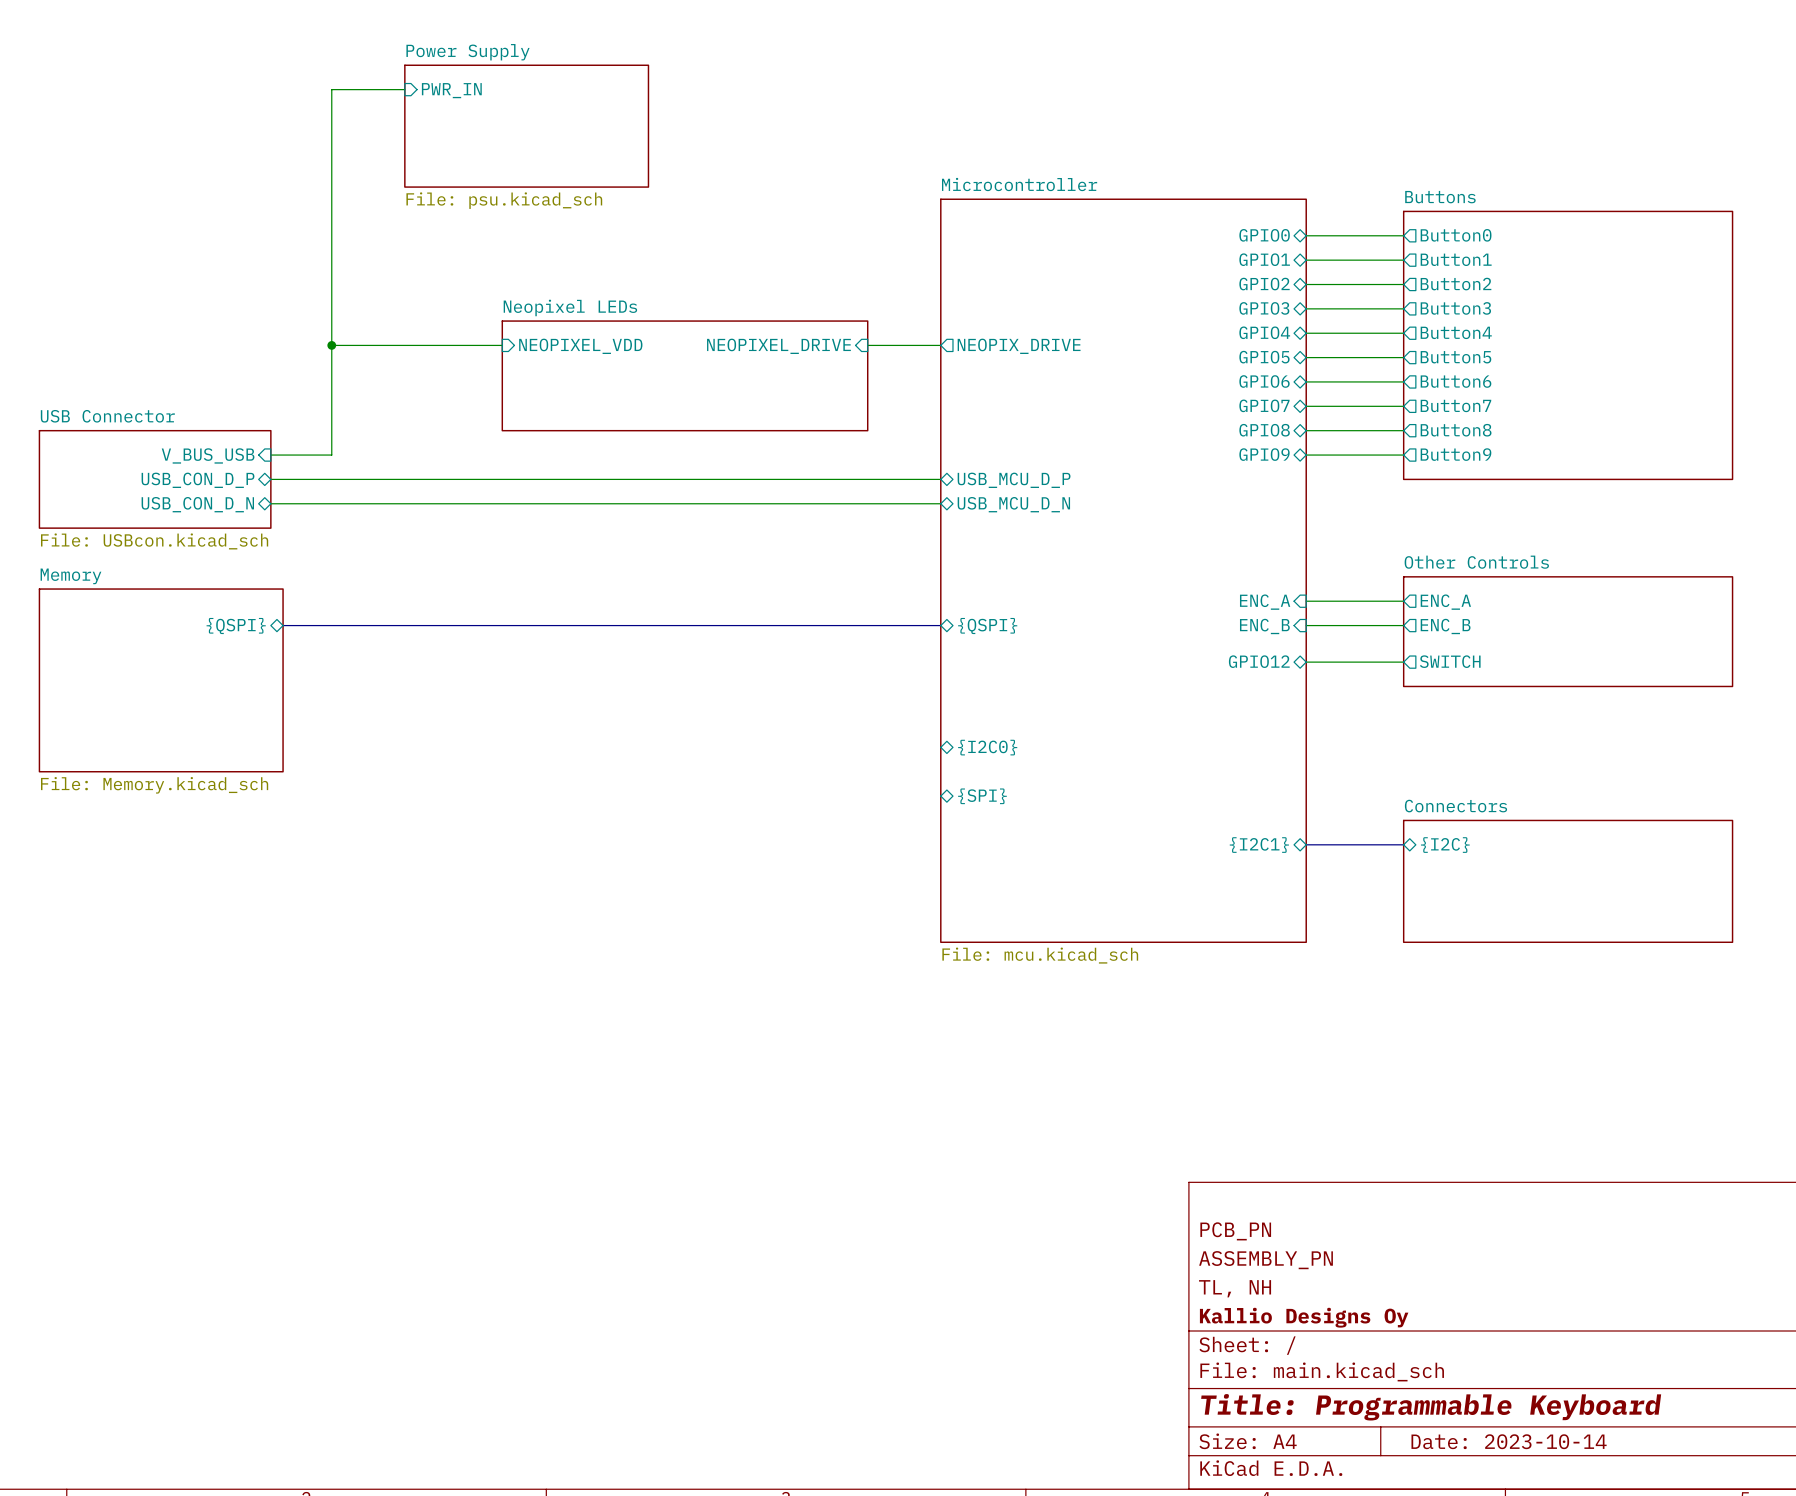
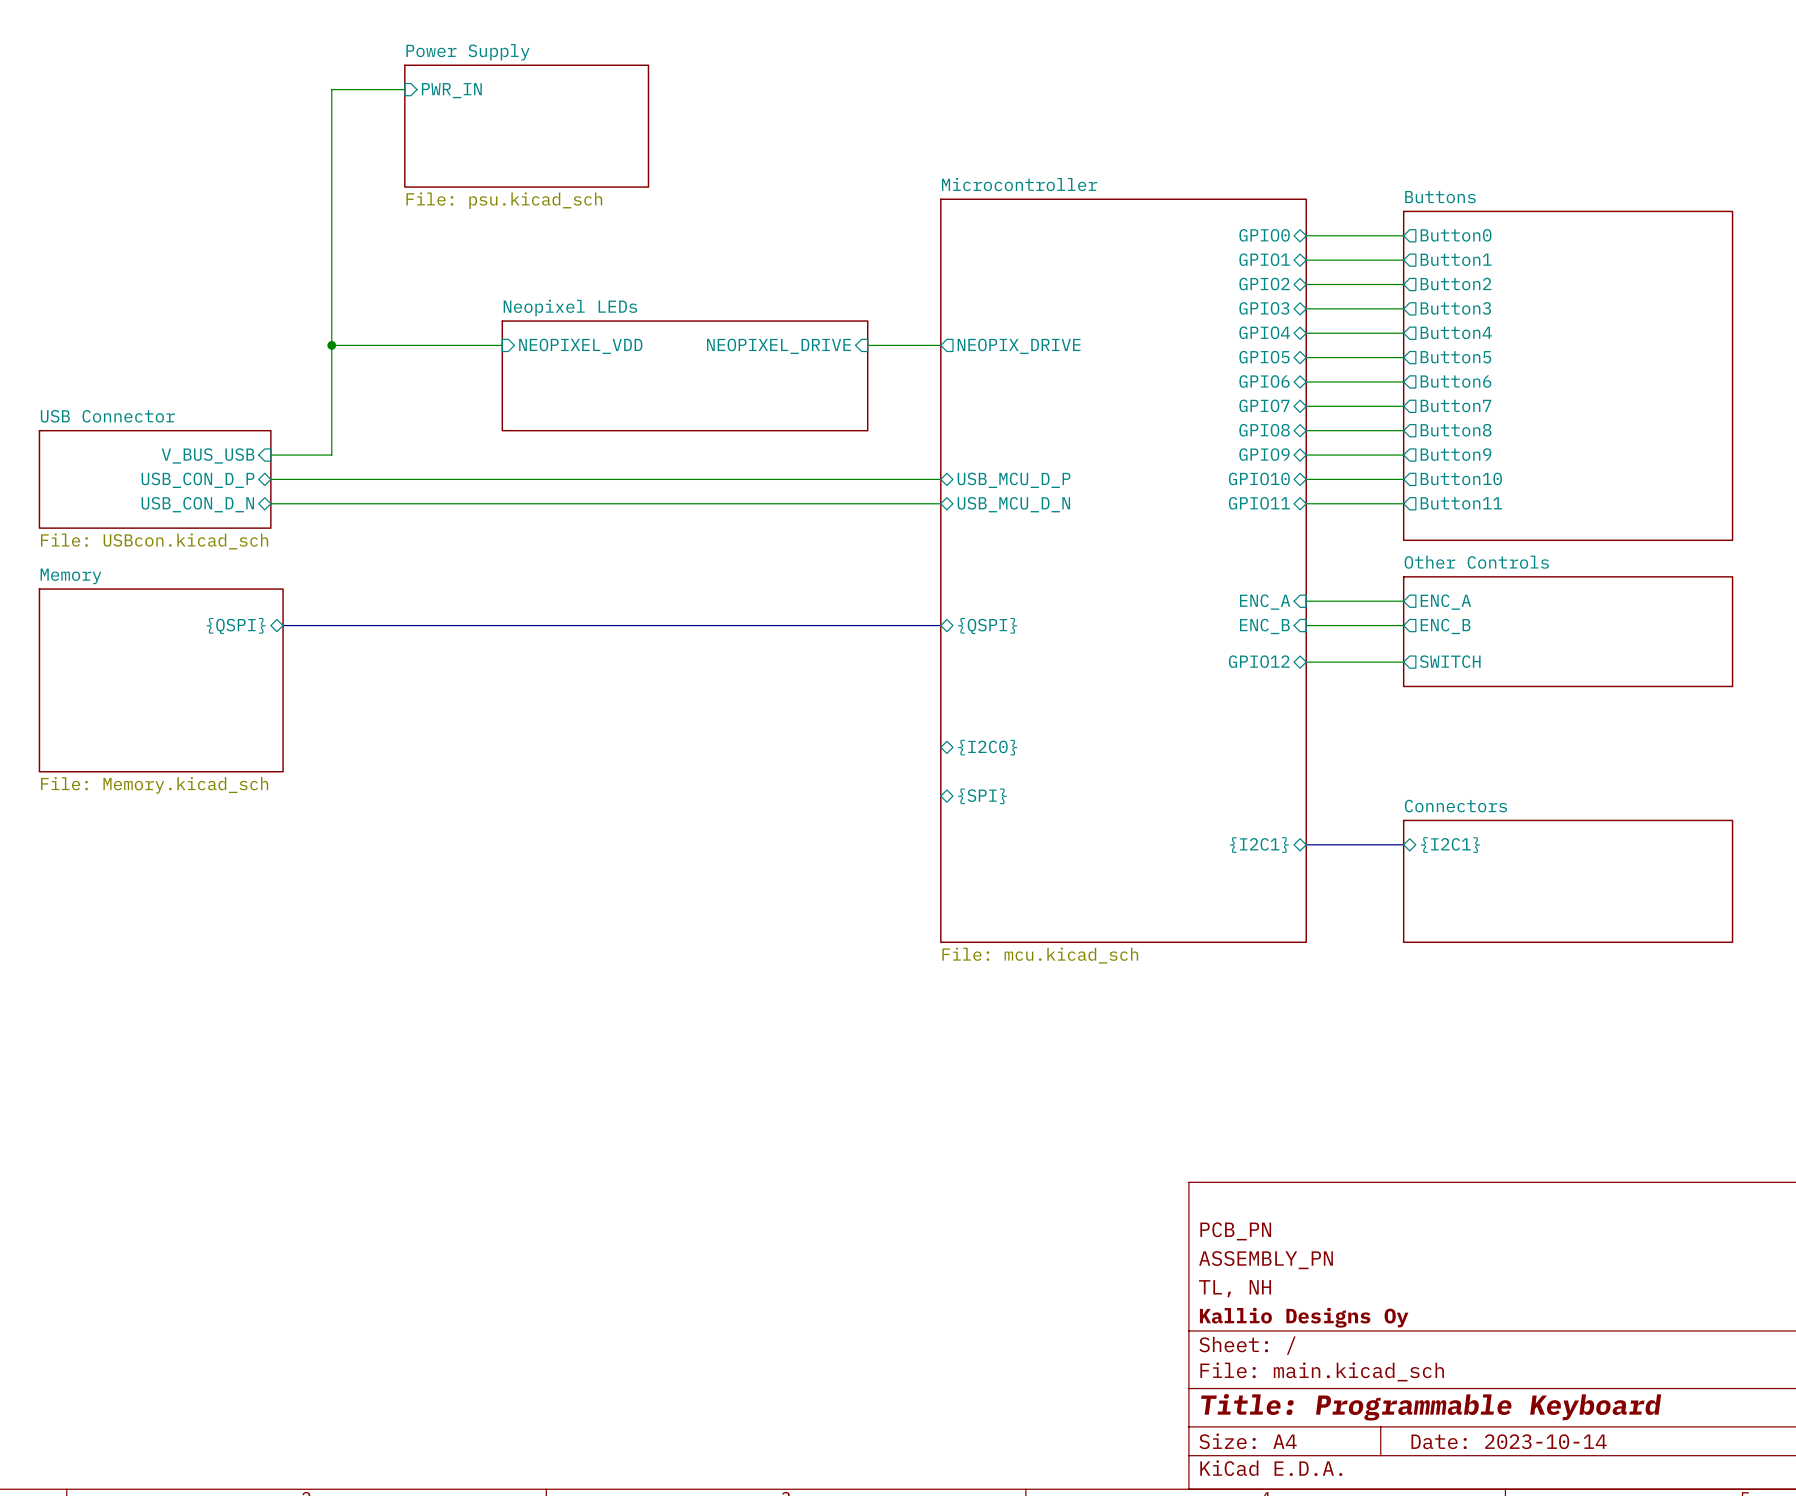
sheet Buttons: (1568, 345) -> none
sheet Buttons: none -> (1568, 375)
sheet pin: none -> GPIO10 (1259, 478)
sheet pin: none -> Button10 (1461, 478)
wire: none -> (1306, 479) (1403, 479)
sheet pin: none -> GPIO11 (1259, 503)
wire: none -> (1306, 503) (1403, 503)
sheet pin: none -> Button11 (1461, 503)
sheet pin: {I2C} (1445, 845) -> {I2C1} (1450, 845)

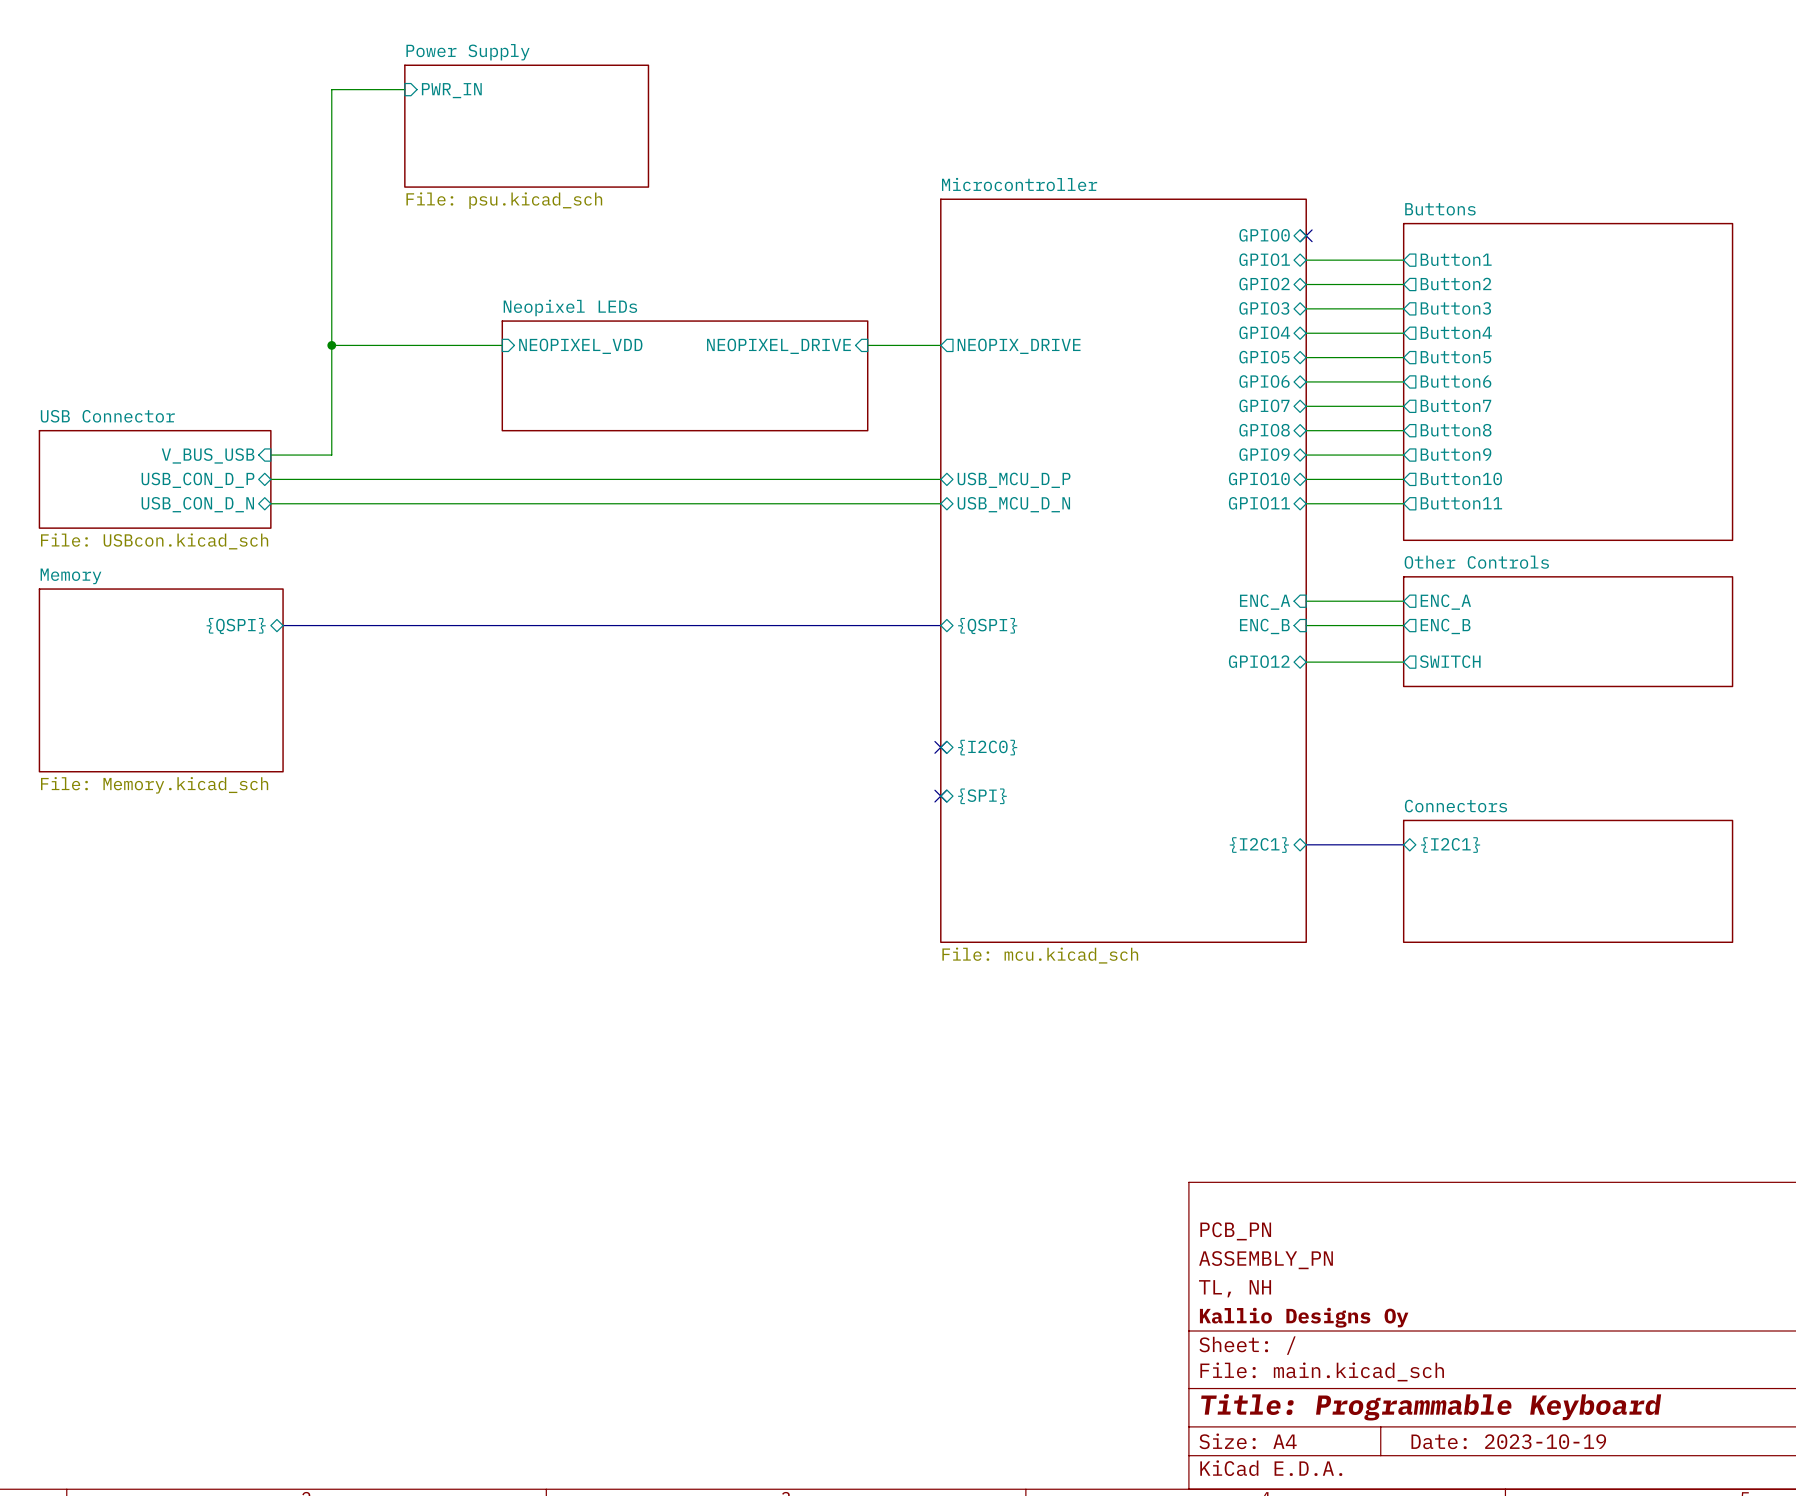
sheet Buttons shape: [1402, 210, 1734, 542] -> [1402, 222, 1734, 542]
wire: (1306, 235) (1403, 235) -> none
no-connect mark: none -> (1306, 235)
sheet pin: Button0 (1456, 235) -> none
no-connect mark: none -> (940, 747)
no-connect mark: none -> (940, 796)
title block: Date: 2023-10-14 (1509, 1441) -> Date: 2023-10-19 (1508, 1441)

